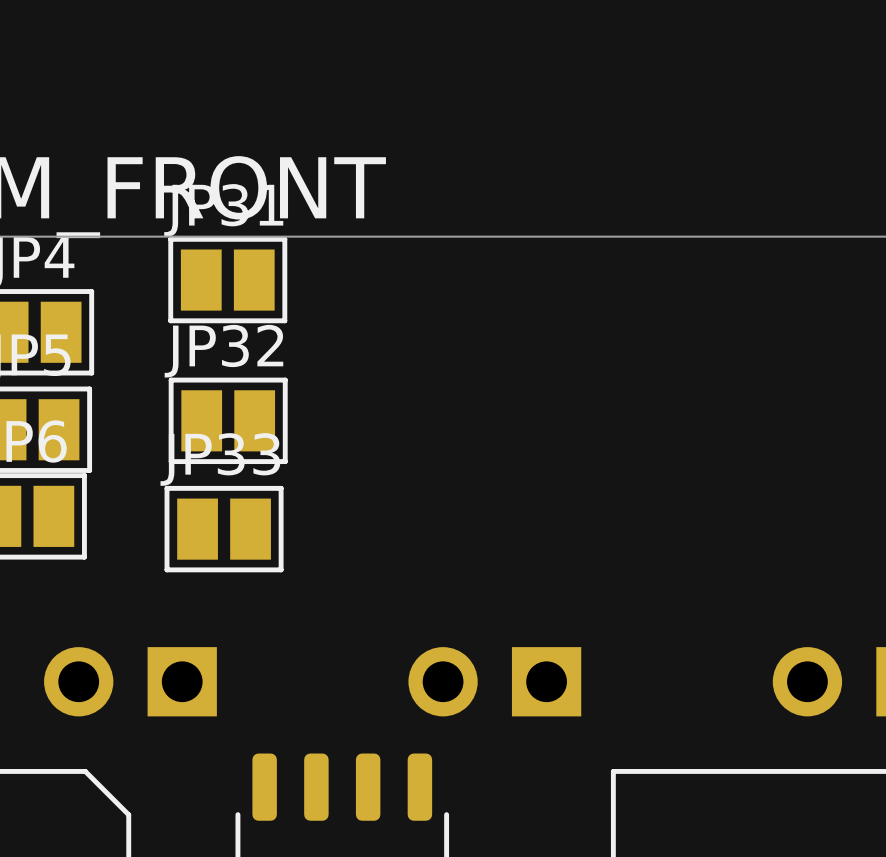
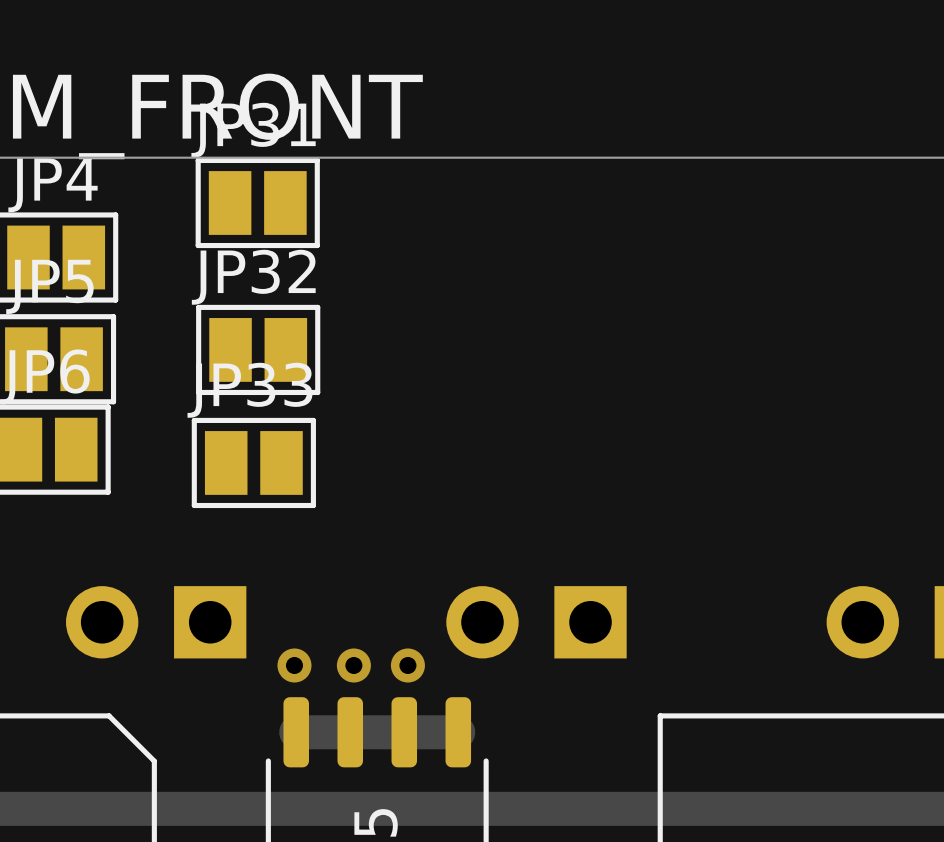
via: none -> (294, 665)
via: none -> (353, 665)
via: none -> (407, 665)
track: none -> (296, 732) (458, 732)

